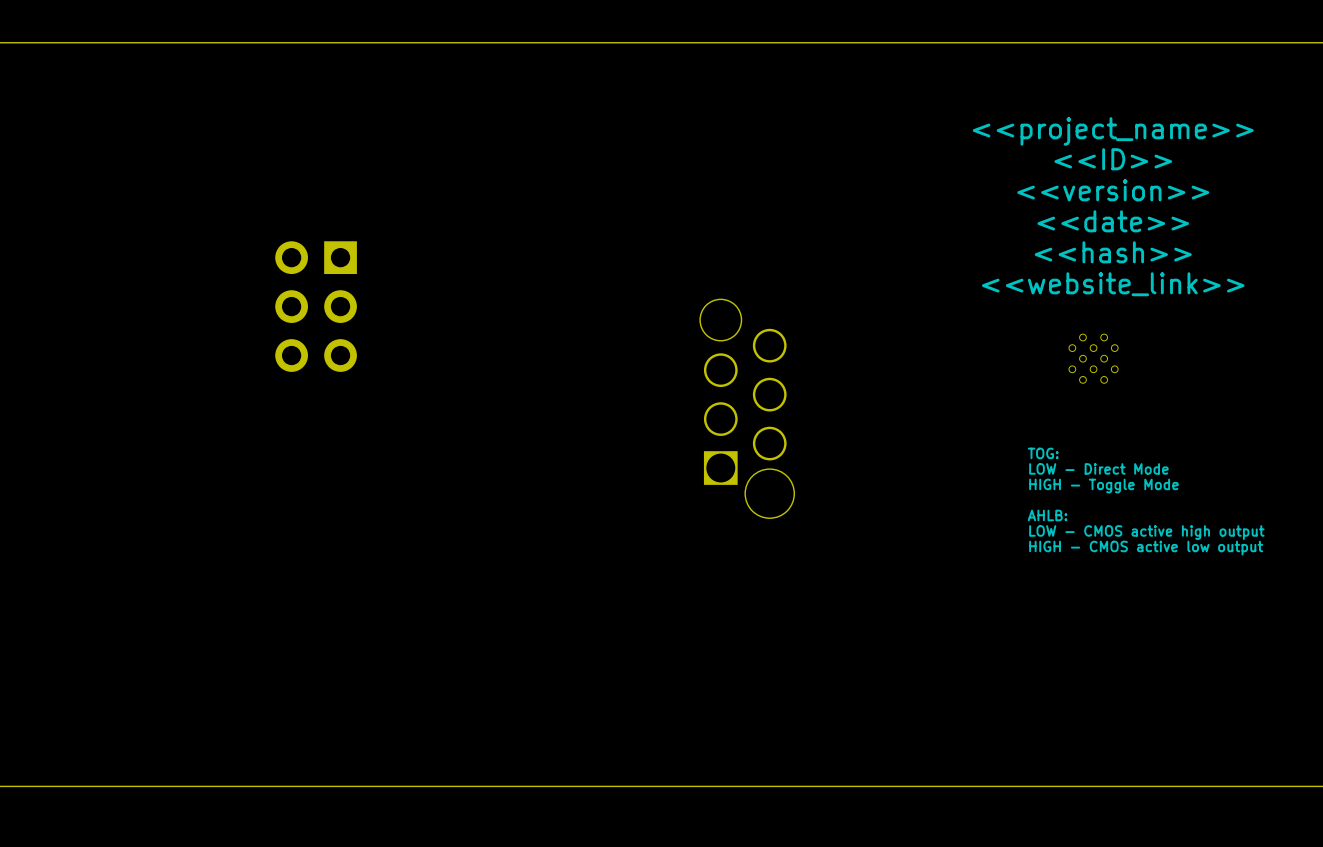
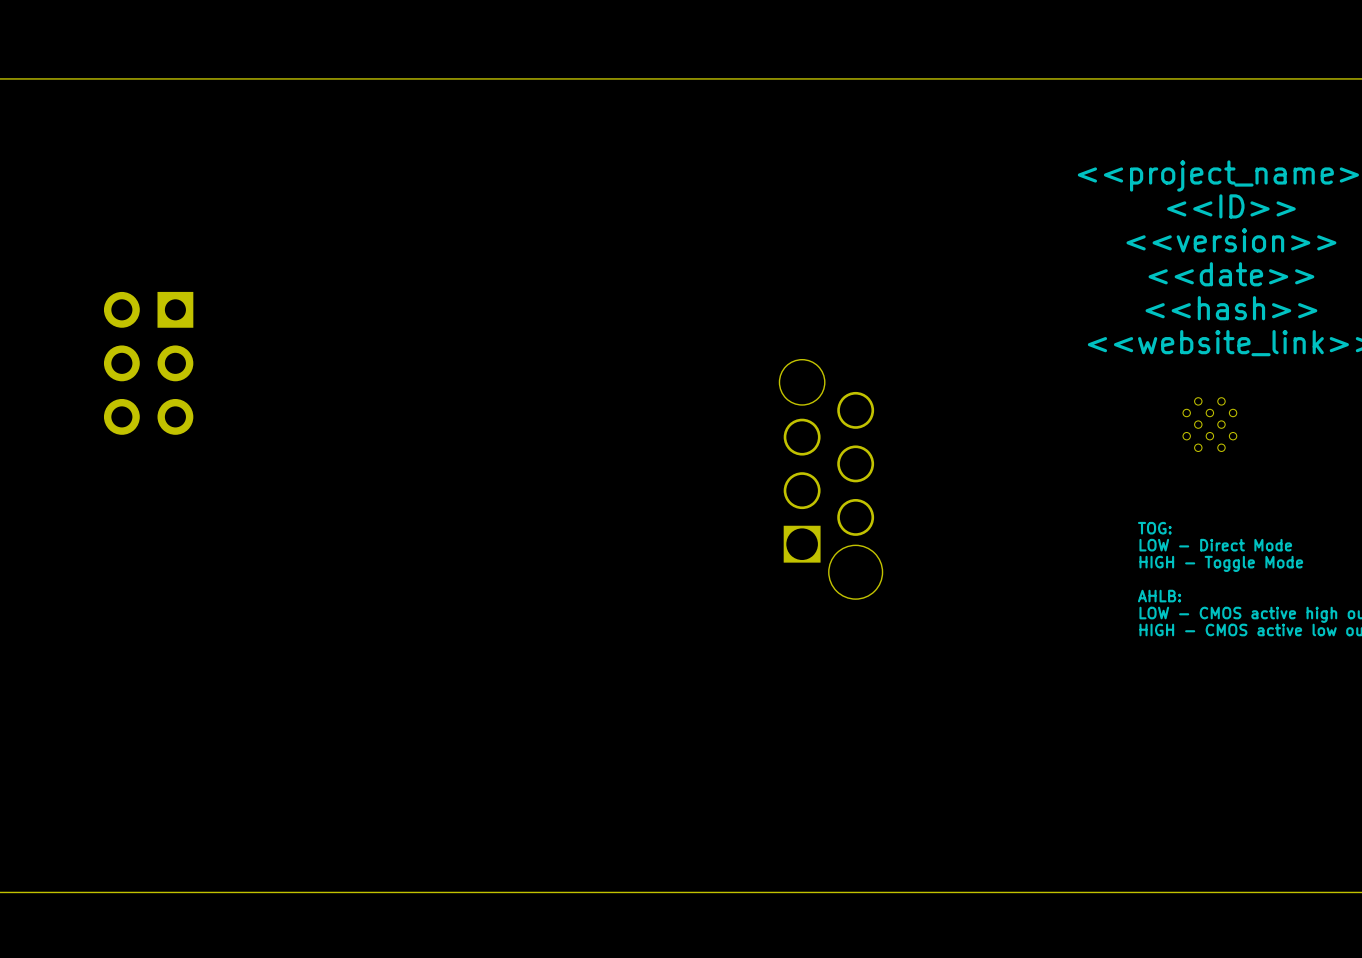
part position: (316, 306) -> (148, 363)

